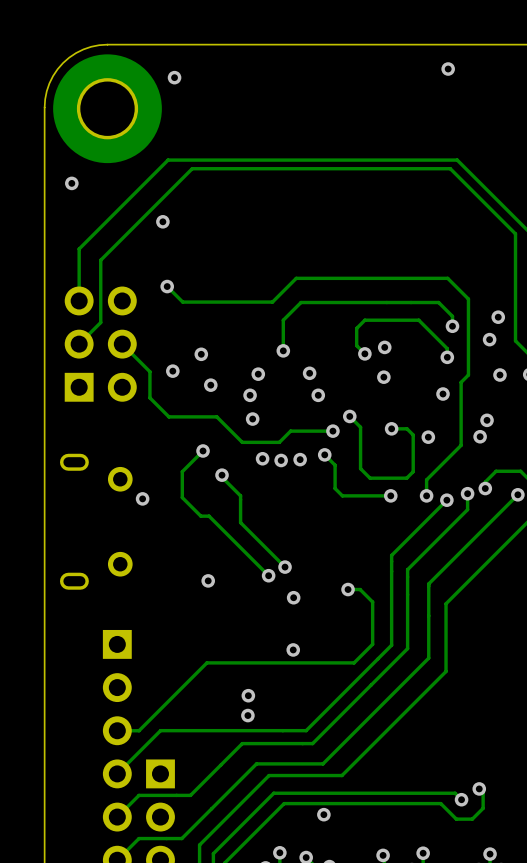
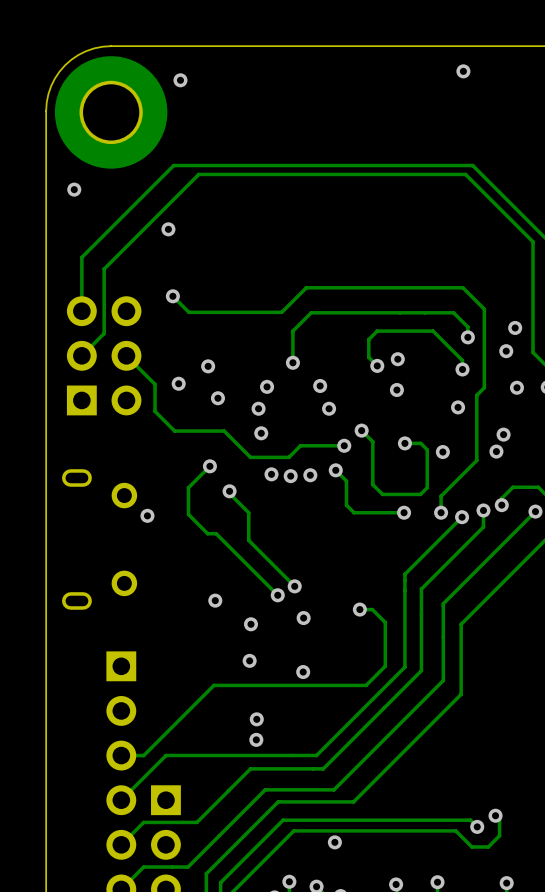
via: none -> (250, 624)
via: none -> (249, 660)

